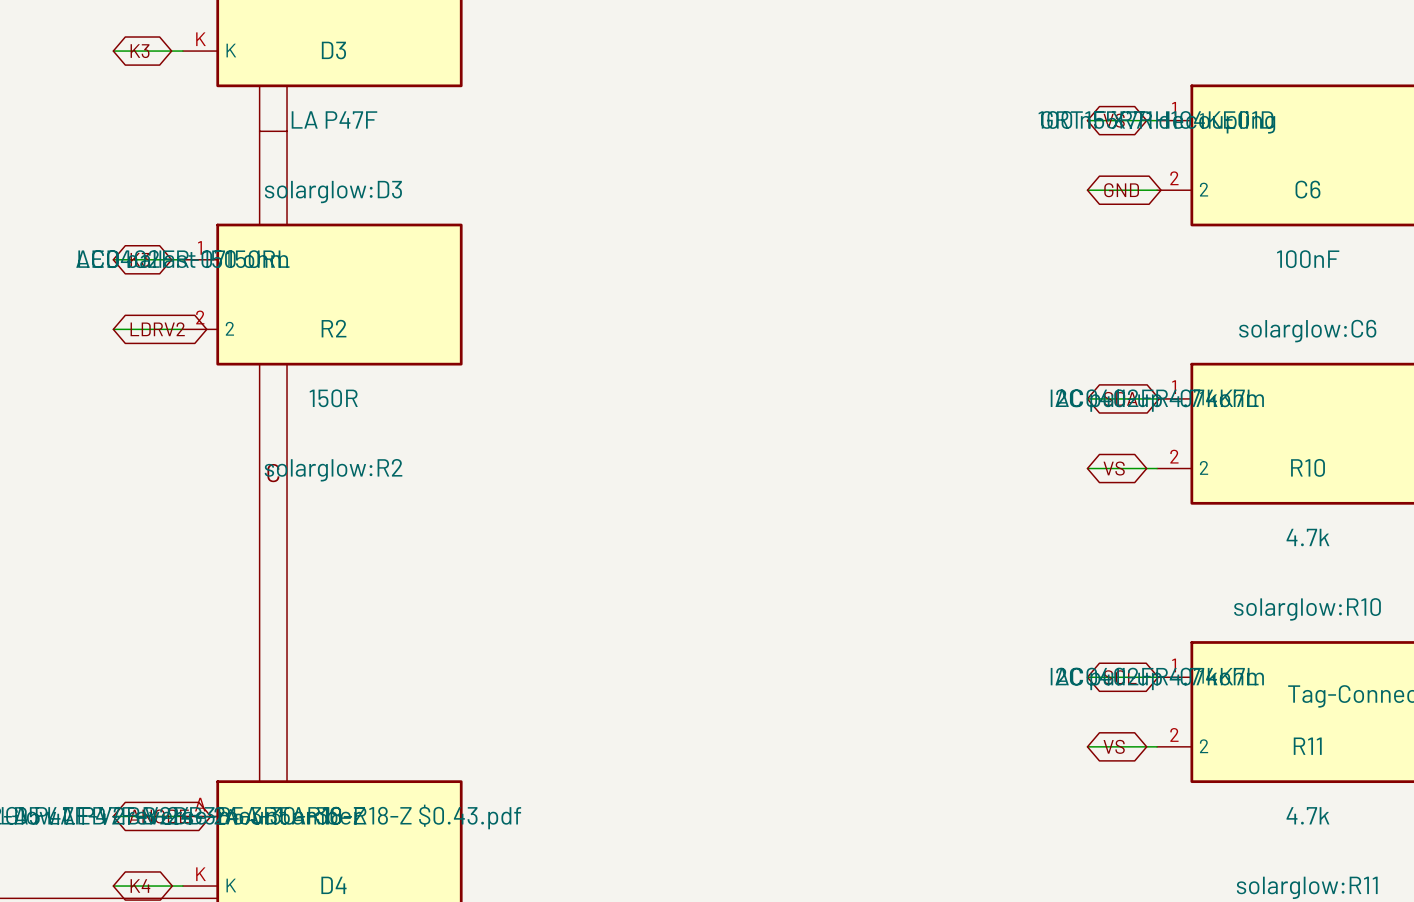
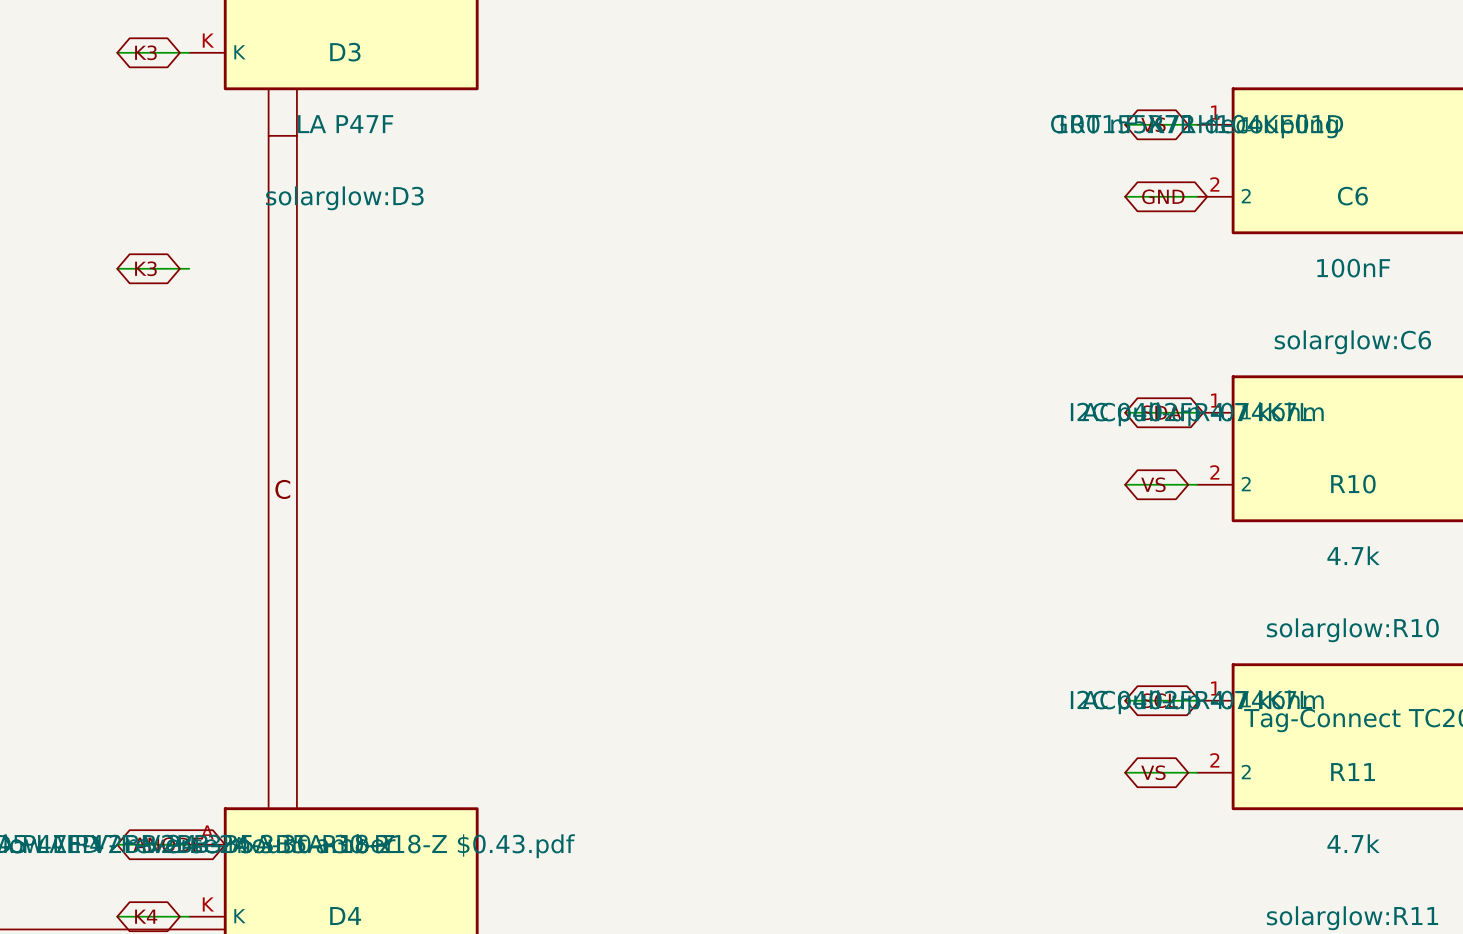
R2: 150R (322, 294) -> none
wire: (113, 329) (182, 329) -> none
global label: LDRV2 (157, 329) -> none

